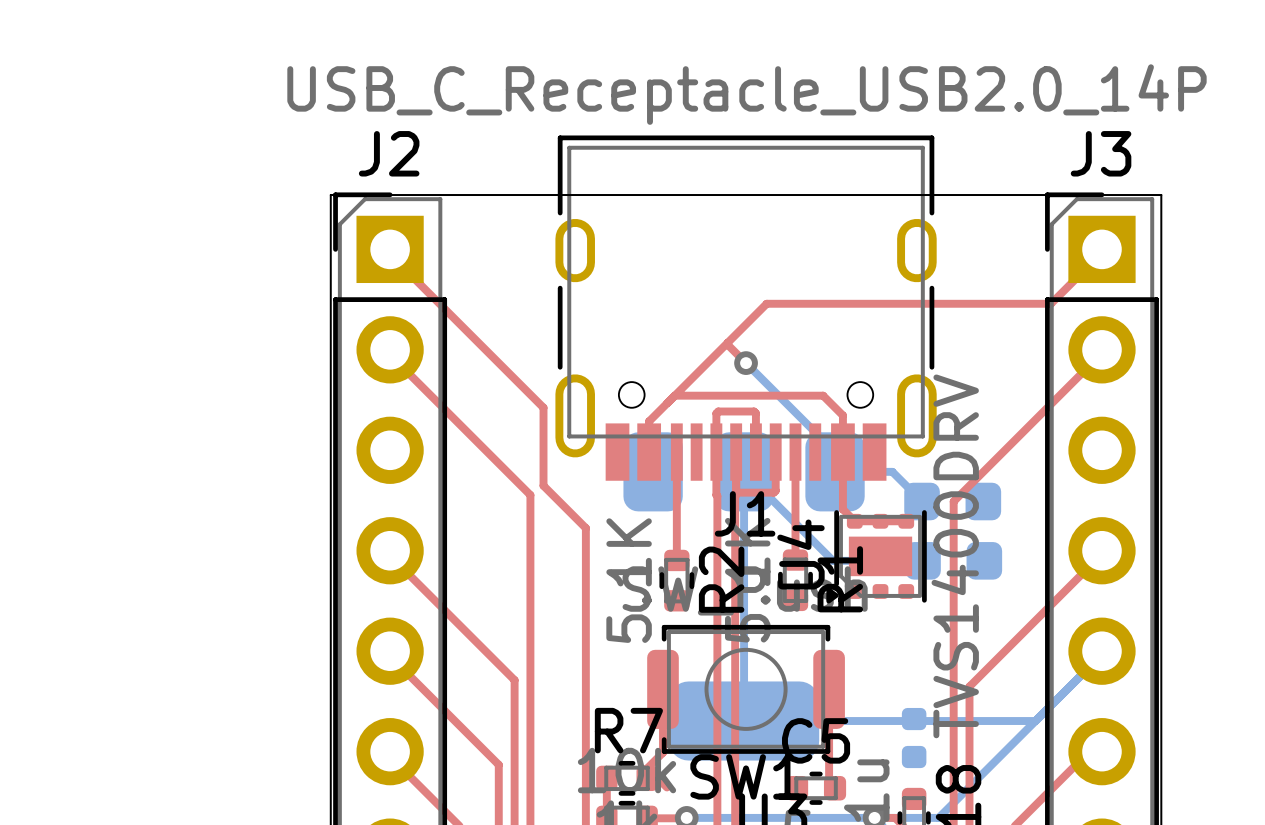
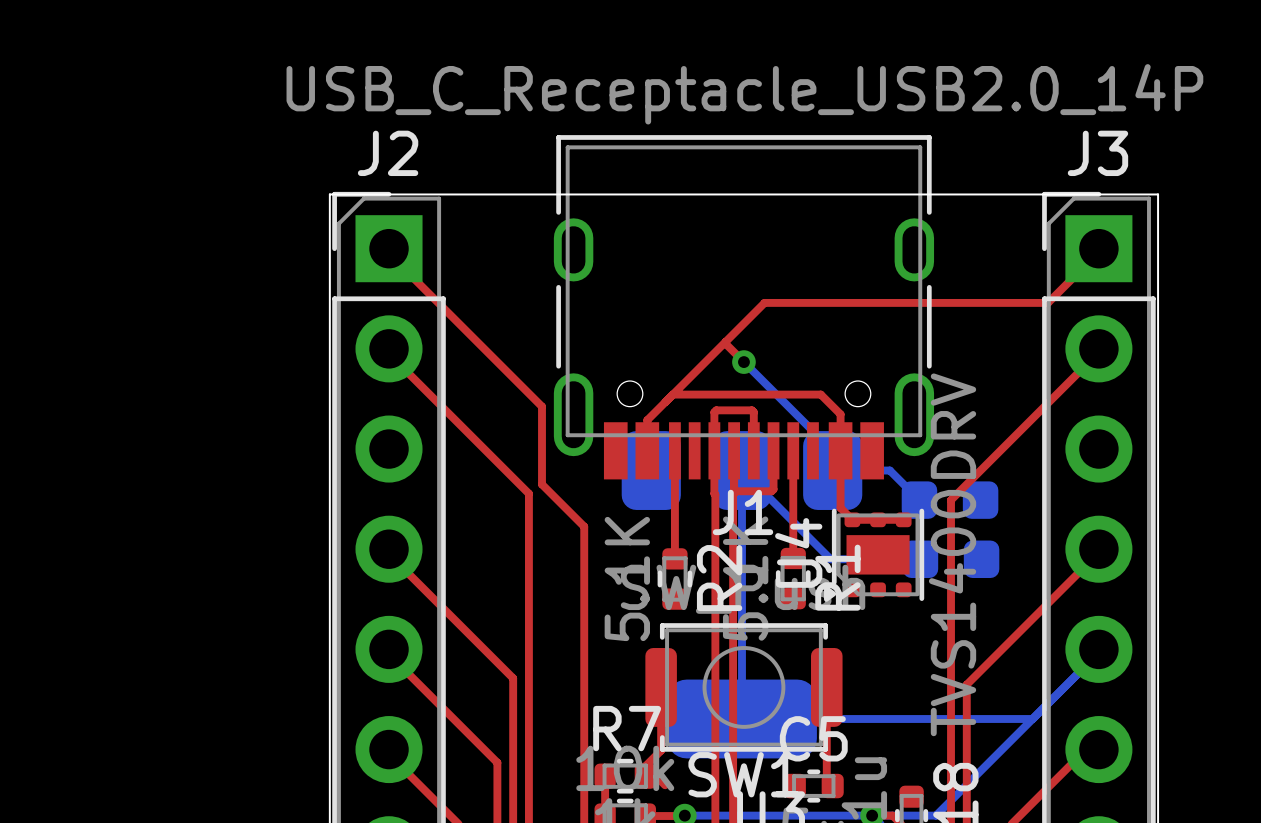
part: (914, 738) -> none

